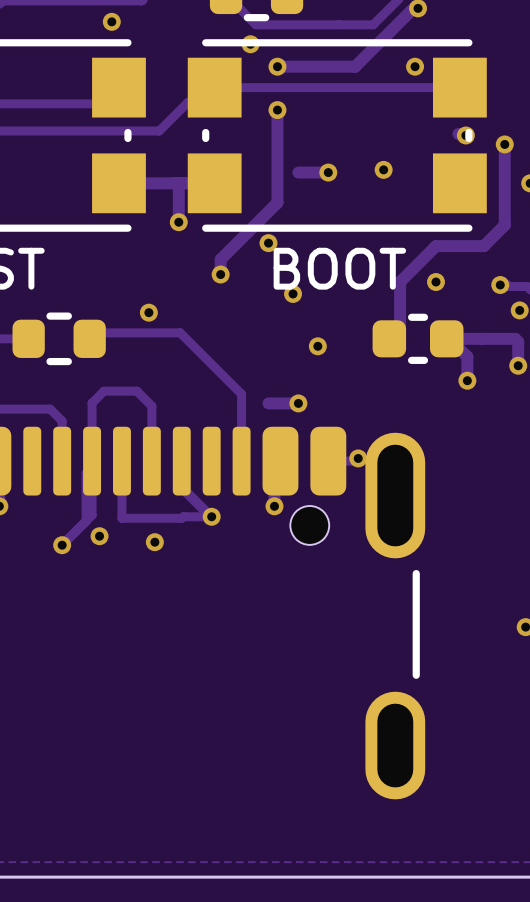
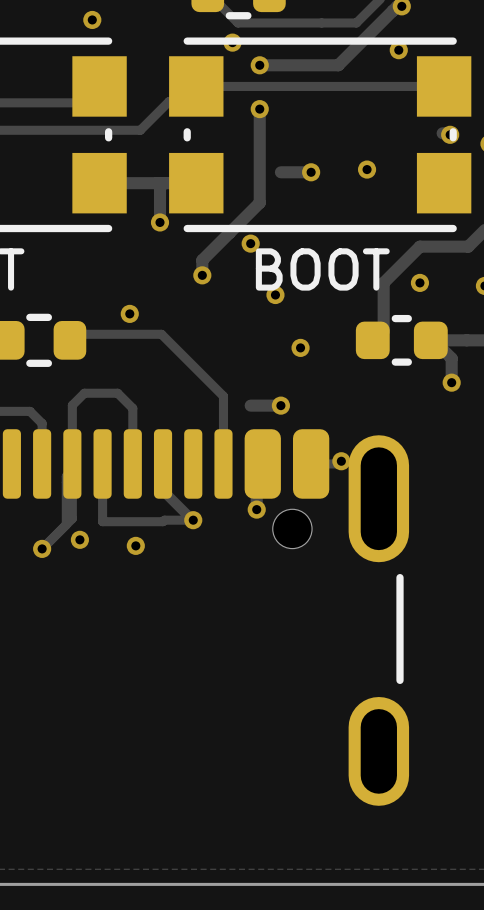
via position: (415, 66) -> (398, 50)

